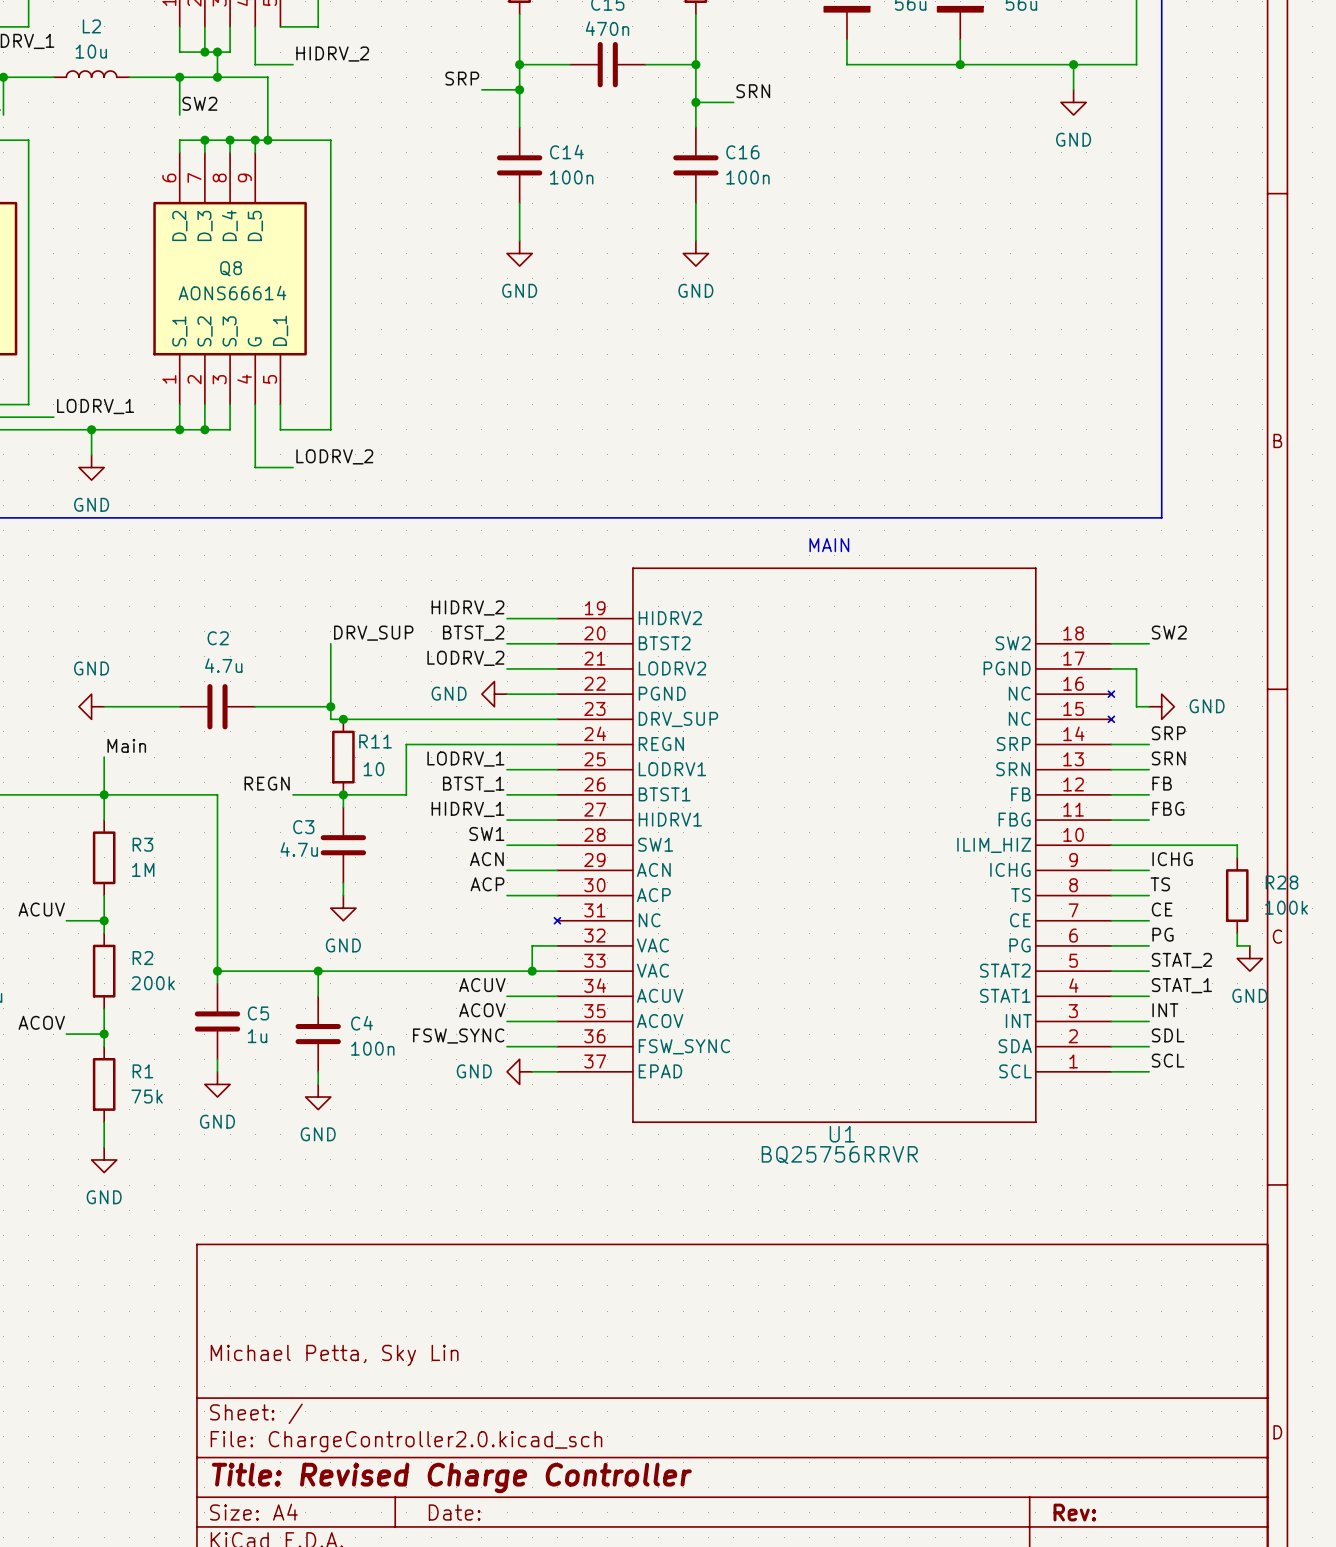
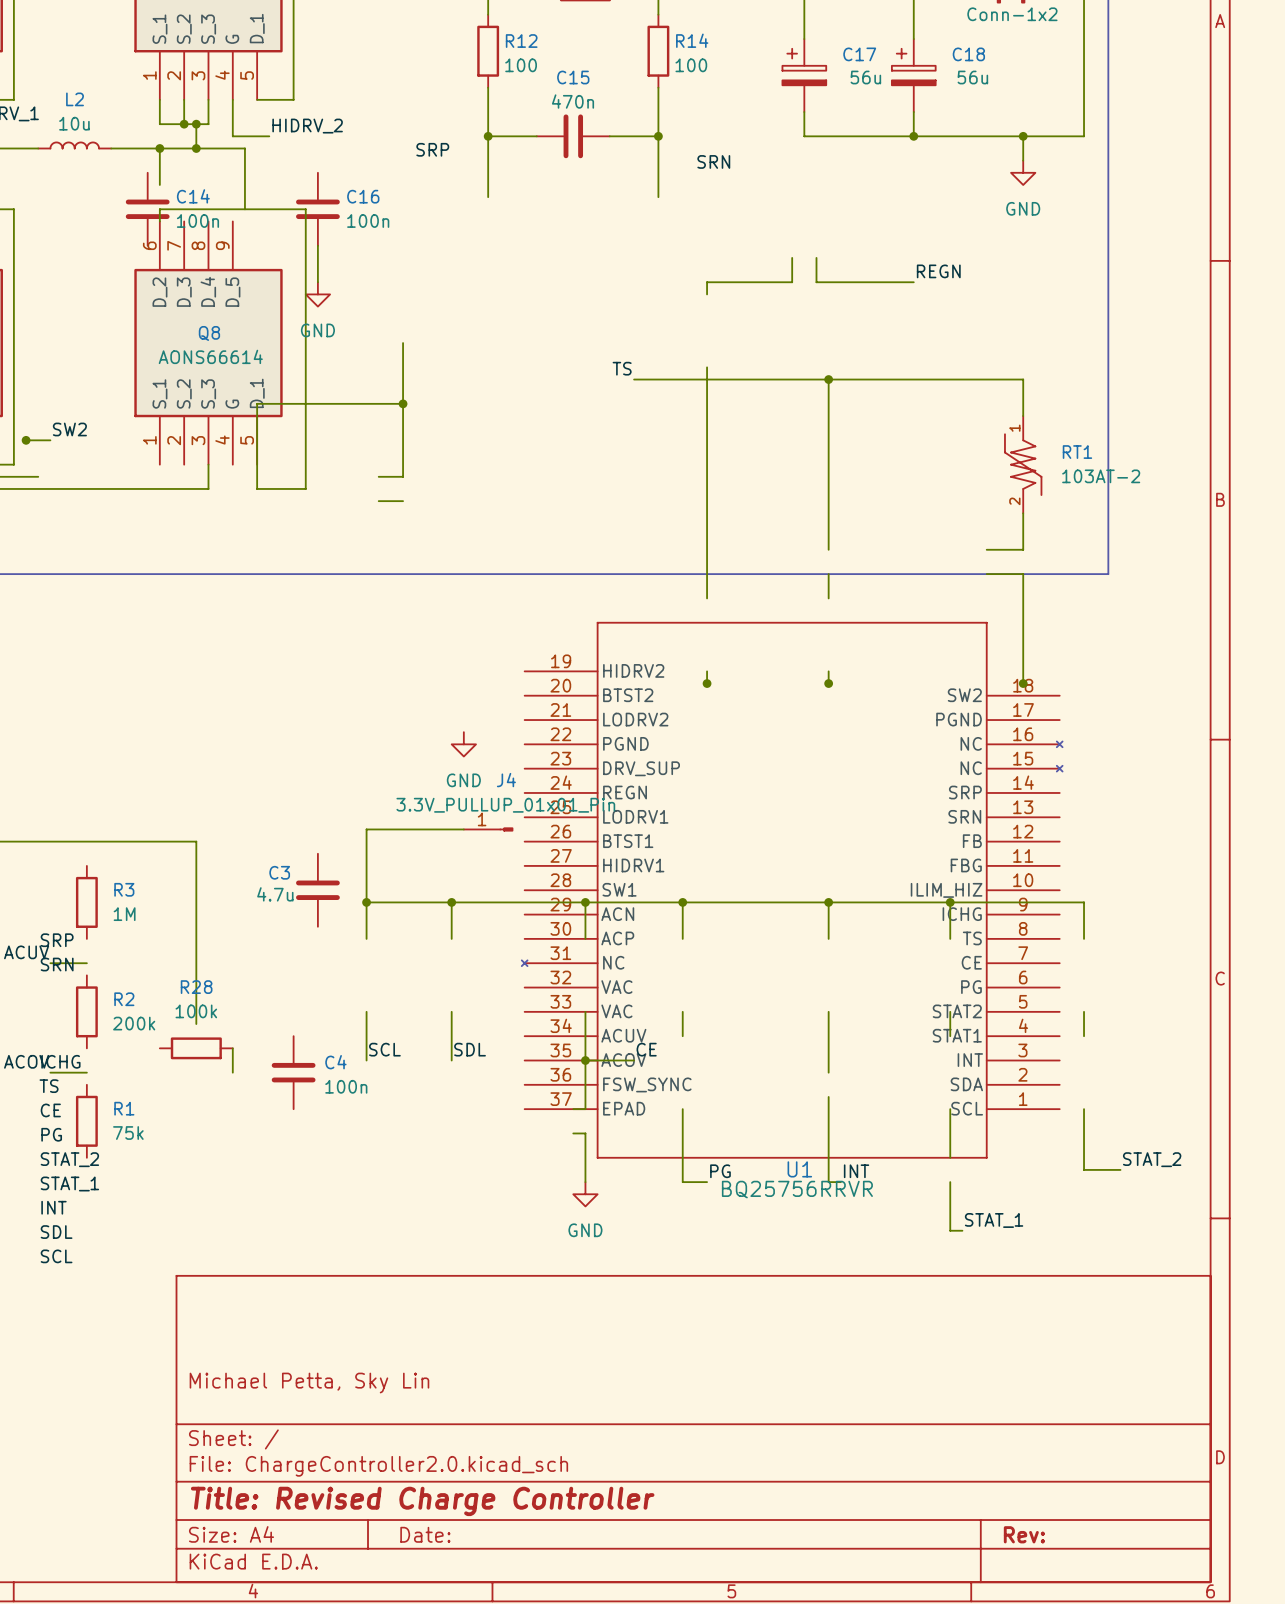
wire: (481, 89) (519, 89) -> none
junction: (519, 89) -> none
wire: (695, 102) (733, 102) -> none
junction: (695, 102) -> none
label: SW2 (199, 103) -> none
wire: (204, 140) (204, 152) -> none
junction: (204, 140) -> none
wire: (230, 140) (230, 152) -> none
junction: (230, 140) -> none
wire: (255, 140) (255, 152) -> none
junction: (255, 140) -> none
junction: (267, 140) -> none
C14 position: (519, 165) -> (147, 209)
C16 position: (695, 165) -> (317, 209)
wire: none -> (792, 257) (792, 282) (707, 282) (707, 294)
wire: none -> (816, 257) (816, 282) (913, 282)
wire: (519, 203) (519, 240) -> (317, 245) (317, 282)
wire: (695, 203) (695, 240) -> none
label: none -> REGN (938, 271)
power symbol: none -> GND (317, 294)
power symbol: GND (519, 253) -> none
power symbol: GND (695, 253) -> none
wire: none -> (403, 343) (403, 476) (378, 476)
wire: none -> (707, 367) (707, 598)
label: none -> TS (622, 368)
wire: none -> (634, 379) (1023, 379) (1023, 416)
wire: none -> (828, 379) (828, 549)
junction: none -> (828, 379)
wire: none -> (403, 403) (257, 403) (257, 464)
junction: none -> (403, 403)
label: none -> SW2 (69, 429)
wire: none -> (26, 440) (50, 440)
junction: none -> (26, 440)
wire: (179, 404) (179, 429) -> none
wire: (204, 404) (204, 429) -> none
wire: (255, 404) (255, 467) (293, 467) -> none
RT1: none -> 103AT-2 (1023, 464)
label: LODRV_1 (95, 406) -> none
wire: (91, 429) (91, 454) -> none
junction: (91, 429) -> none
junction: (179, 429) -> none
junction: (204, 429) -> none
wire: none -> (378, 501) (403, 501)
wire: none -> (1023, 513) (1023, 549) (986, 549)
label: LODRV_2 (334, 456) -> none
power symbol: GND (91, 467) -> none
wire: none -> (828, 574) (828, 598)
wire: none -> (986, 574) (1023, 574) (1023, 683)
text: MAIN (829, 545) -> none
label: HIDRV_2 (467, 607) -> none
wire: (507, 618) (557, 618) -> none
wire: none -> (707, 671) (707, 683)
wire: none -> (828, 671) (828, 683)
junction: none -> (707, 683)
junction: none -> (828, 683)
junction: none -> (1023, 683)
label: SW2 (1169, 632) -> none
label: DRV_SUP (373, 633) -> none
label: BTST_2 (473, 633) -> none
wire: (330, 643) (330, 719) (557, 719) -> none
wire: (507, 643) (557, 643) -> none
wire: (1111, 643) (1149, 643) -> none
label: LODRV_2 (465, 658) -> none
wire: (507, 668) (557, 668) -> none
wire: (1111, 668) (1136, 668) (1136, 706) (1149, 706) -> none
power symbol rotation: 0° (494, 694) -> 90° counterclockwise (463, 744)
wire: (507, 694) (557, 694) -> none
power symbol: GND (91, 706) -> none
wire: (104, 706) (179, 706) -> none
C2: 4.7u (217, 706) -> none
wire: (255, 706) (330, 706) -> none
junction: (330, 706) -> none
power symbol: GND (1161, 706) -> none
junction: (343, 719) -> none
label: SRP (1168, 733) -> none
wire: (557, 744) (406, 744) (406, 794) (293, 794) -> none
wire: (1111, 744) (1149, 744) -> none
label: Main (126, 745) -> none
wire: (104, 757) (104, 820) -> none
R11: 10 (343, 757) -> none
label: SRN (1168, 758) -> none
label: LODRV_1 (465, 759) -> none
wire: (507, 769) (557, 769) -> none
wire: (1111, 769) (1149, 769) -> none
wire: none -> (463, 829) (366, 829) (366, 938)
J4: none -> 3.3V_PULLUP_01x01_Pin (488, 829)
label: REGN (267, 783) -> none
label: FB (1162, 783) -> none
label: BTST_1 (473, 784) -> none
junction: (104, 794) -> none
wire: (343, 794) (343, 807) -> none
junction: (343, 794) -> none
wire: (507, 794) (557, 794) -> none
wire: (1111, 794) (1149, 794) -> none
label: FBG (1168, 808) -> none
label: HIDRV_1 (467, 809) -> none
wire: (507, 820) (557, 820) -> none
wire: (1111, 820) (1149, 820) -> none
label: SW1 (486, 833) -> none
wire: (507, 845) (557, 845) -> none
wire: (1111, 845) (1237, 845) (1237, 857) -> none
wire: none -> (366, 902) (1084, 902) (1084, 938)
junction: none -> (366, 902)
wire: none -> (451, 902) (451, 938)
junction: none -> (451, 902)
wire: none -> (585, 902) (585, 938)
junction: none -> (585, 902)
wire: none -> (682, 902) (682, 938)
junction: none -> (682, 902)
wire: none -> (828, 902) (828, 938)
junction: none -> (828, 902)
wire: none -> (950, 902) (950, 938)
junction: none -> (950, 902)
label: ACN (486, 859) -> none
label: ICHG (1172, 859) -> none
wire: (507, 870) (557, 870) -> none
wire: (1111, 870) (1149, 870) -> none
wire: (343, 882) (343, 895) -> none
R28 name position: R28 (1282, 882) -> R28 (196, 987)
label: ACP (487, 884) -> none
label: TS (1160, 884) -> none
wire: (104, 895) (104, 933) -> none
wire: (507, 895) (557, 895) -> none
wire: (1111, 895) (1149, 895) -> none
R28 rotation: 0° (1237, 895) -> 90° clockwise (196, 1048)
R28 position: (1237, 895) -> (196, 1048)
label: none -> SRP (57, 940)
R28 value position: 100k (1286, 907) -> 100k (196, 1011)
power symbol: GND (343, 908) -> none
label: CE (1162, 909) -> none
junction: (104, 920) -> none
wire: (1111, 920) (1149, 920) -> none
label: none -> SRN (57, 964)
wire: (1237, 933) (1237, 945) (1249, 945) -> none
label: PG (1163, 934) -> none
wire: (557, 945) (532, 945) (532, 971) -> none
wire: (1111, 945) (1149, 945) -> none
power symbol: GND (1249, 958) -> none
label position: STAT_2 (1181, 960) -> STAT_2 (1152, 1159)
wire: (217, 971) (557, 971) -> none
junction: (217, 971) -> none
wire: (318, 971) (318, 996) -> (232, 1048) (232, 1072)
junction: (318, 971) -> none
wire: none -> (366, 1011) (366, 1060)
wire: none -> (451, 1011) (451, 1060)
junction: (532, 971) -> none
wire: none -> (585, 1011) (585, 1109) (573, 1109)
wire: none -> (682, 1011) (682, 1036)
wire: none -> (828, 1011) (828, 1072)
wire: none -> (950, 1011) (950, 1036)
wire: (1111, 971) (1149, 971) -> none
wire: none -> (1084, 1011) (1084, 1036)
label: ACUV (482, 985) -> none
label position: STAT_1 (1181, 985) -> STAT_1 (994, 1220)
wire: (507, 996) (557, 996) -> none
wire: (1111, 996) (1149, 996) -> none
wire: (104, 1008) (104, 1046) -> none
label: none -> SCL (384, 1049)
label: ACOV (482, 1010) -> none
label: none -> SDL (470, 1049)
label: none -> CE (646, 1049)
label: INT (1165, 1010) -> none
C5: 1u (217, 1021) -> none
wire: (507, 1021) (557, 1021) -> (585, 1060) (634, 1060)
junction: none -> (585, 1060)
wire: (1111, 1021) (1149, 1021) -> none
label: none -> ICHG (60, 1061)
junction: (104, 1034) -> none
label: SDL (1168, 1035) -> none
label: FSW_SYNC (458, 1036) -> none
wire: (507, 1046) (557, 1046) -> none
wire: (1111, 1046) (1149, 1046) -> none
label: none -> TS (49, 1086)
wire: (217, 1059) (217, 1071) -> none
wire: none -> (828, 1096) (828, 1182) (840, 1182)
label: SCL (1168, 1060) -> none
wire: (318, 1071) (318, 1084) -> none
power symbol rotation: 0° (519, 1071) -> 90° counterclockwise (585, 1194)
power symbol position: GND (519, 1071) -> GND (585, 1194)
wire: (532, 1071) (557, 1071) -> none
wire: none -> (682, 1109) (682, 1182) (707, 1182)
wire: none -> (950, 1109) (950, 1157)
wire: (1111, 1071) (1149, 1071) -> none
wire: none -> (1084, 1109) (1084, 1169) (1120, 1169)
label: none -> CE (50, 1110)
power symbol: GND (217, 1084) -> none
power symbol: GND (318, 1097) -> none
wire: none -> (573, 1133) (585, 1133) (585, 1182)
label: none -> PG (51, 1134)
wire: (104, 1122) (104, 1147) -> none
label: none -> STAT_2 (69, 1159)
label: none -> PG (720, 1171)
label: none -> INT (856, 1171)
wire: none -> (950, 1182) (950, 1230) (962, 1230)
label: none -> STAT_1 (69, 1183)
power symbol: GND (104, 1159) -> none
label: none -> INT (53, 1207)
label: none -> SDL (56, 1232)
label: none -> SCL (56, 1256)

